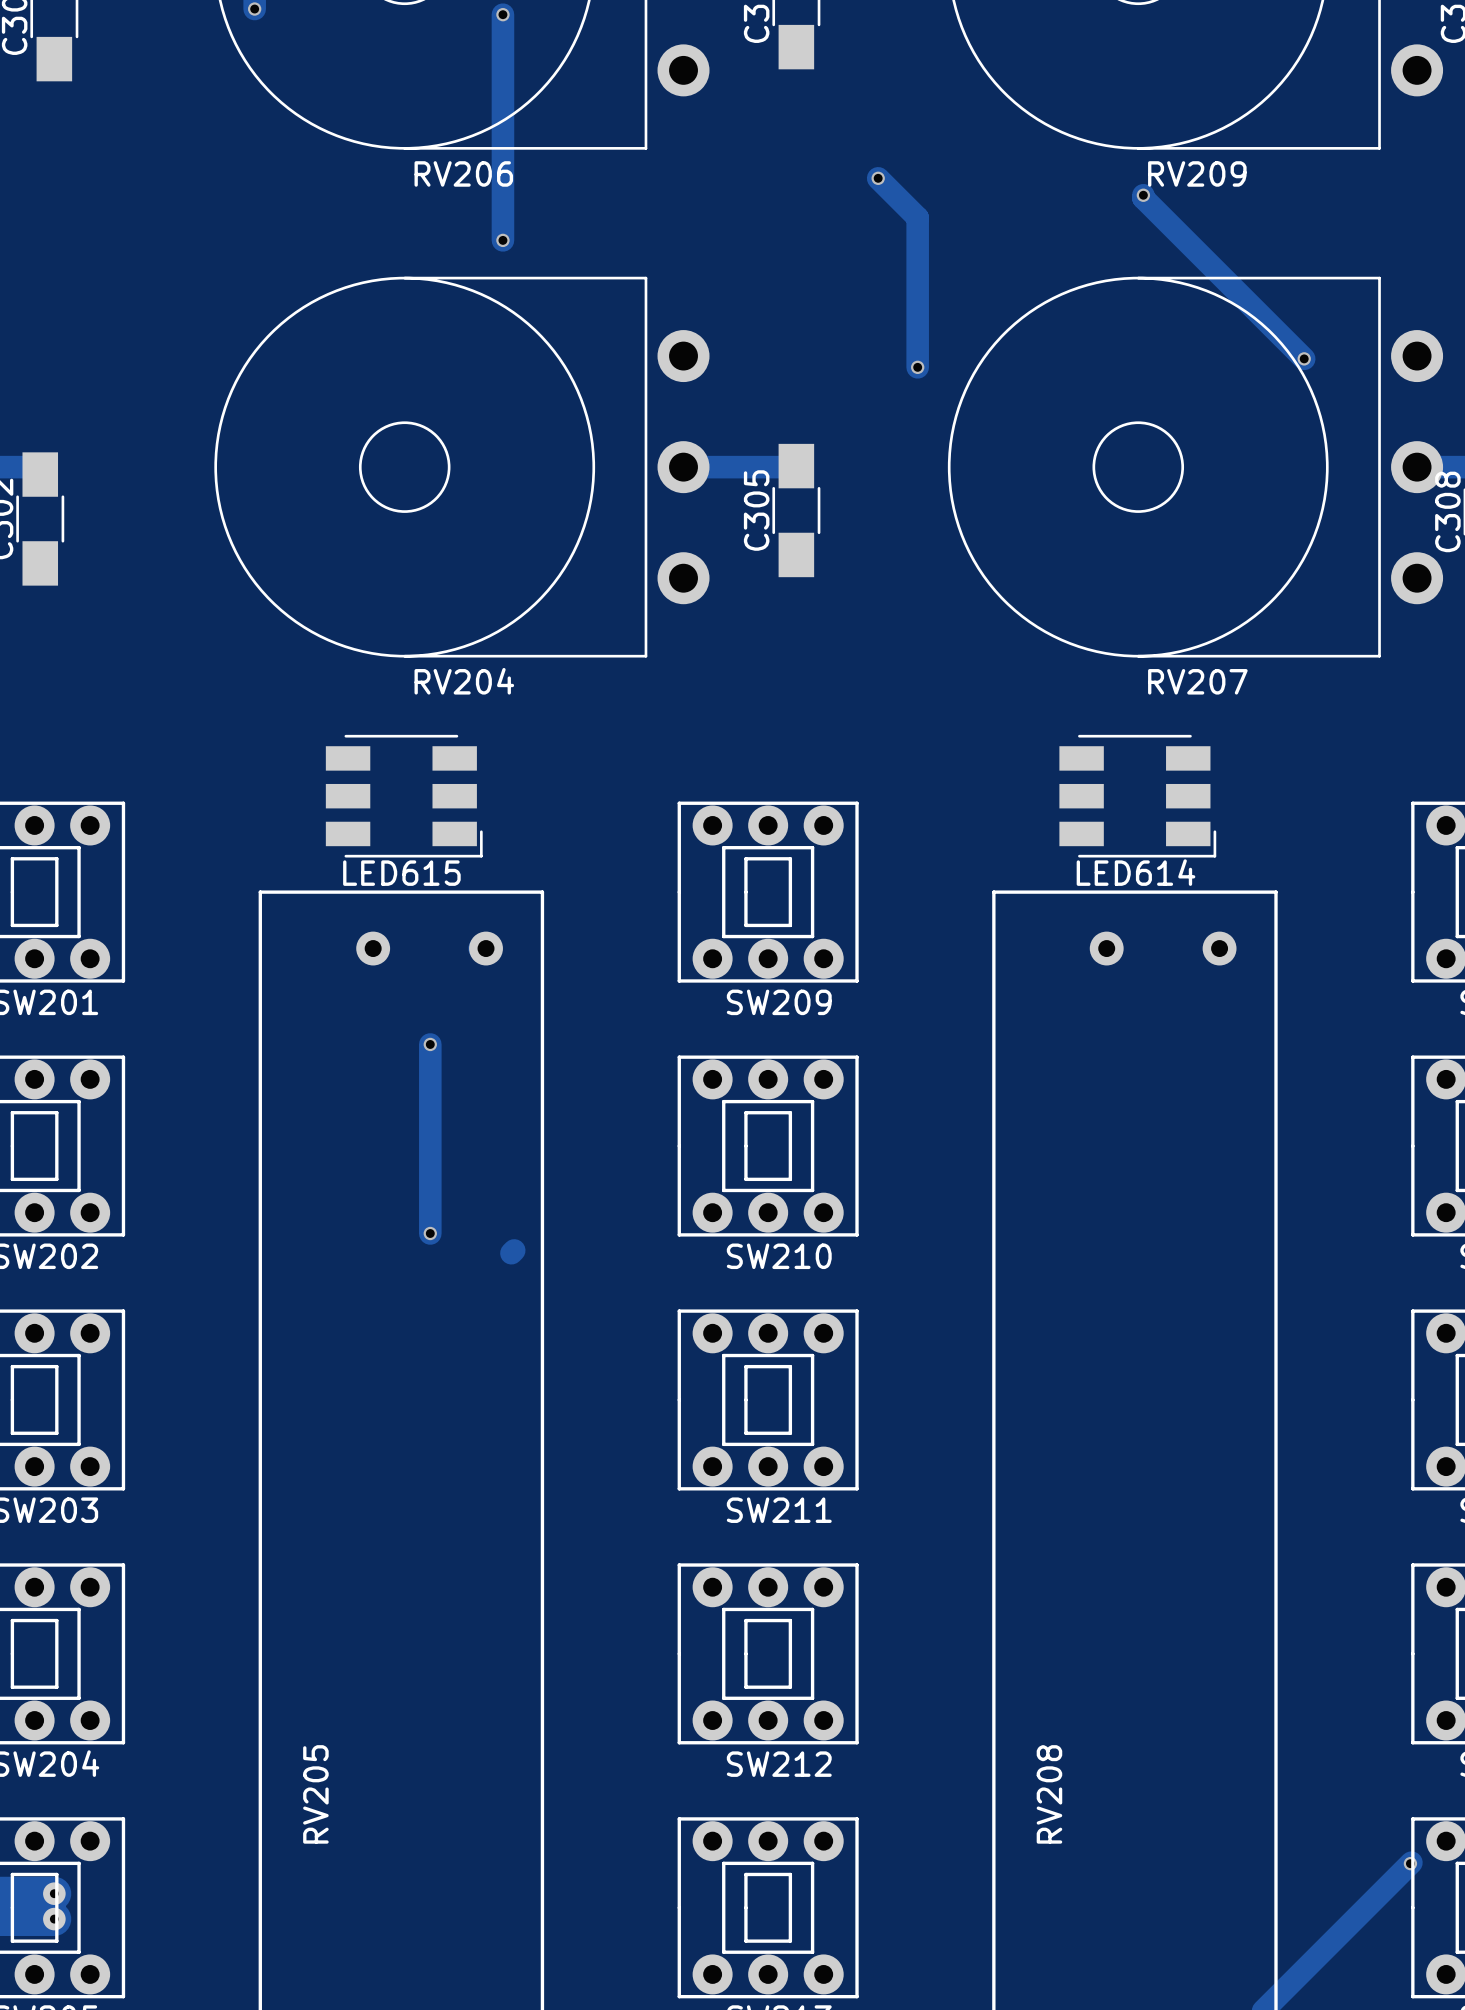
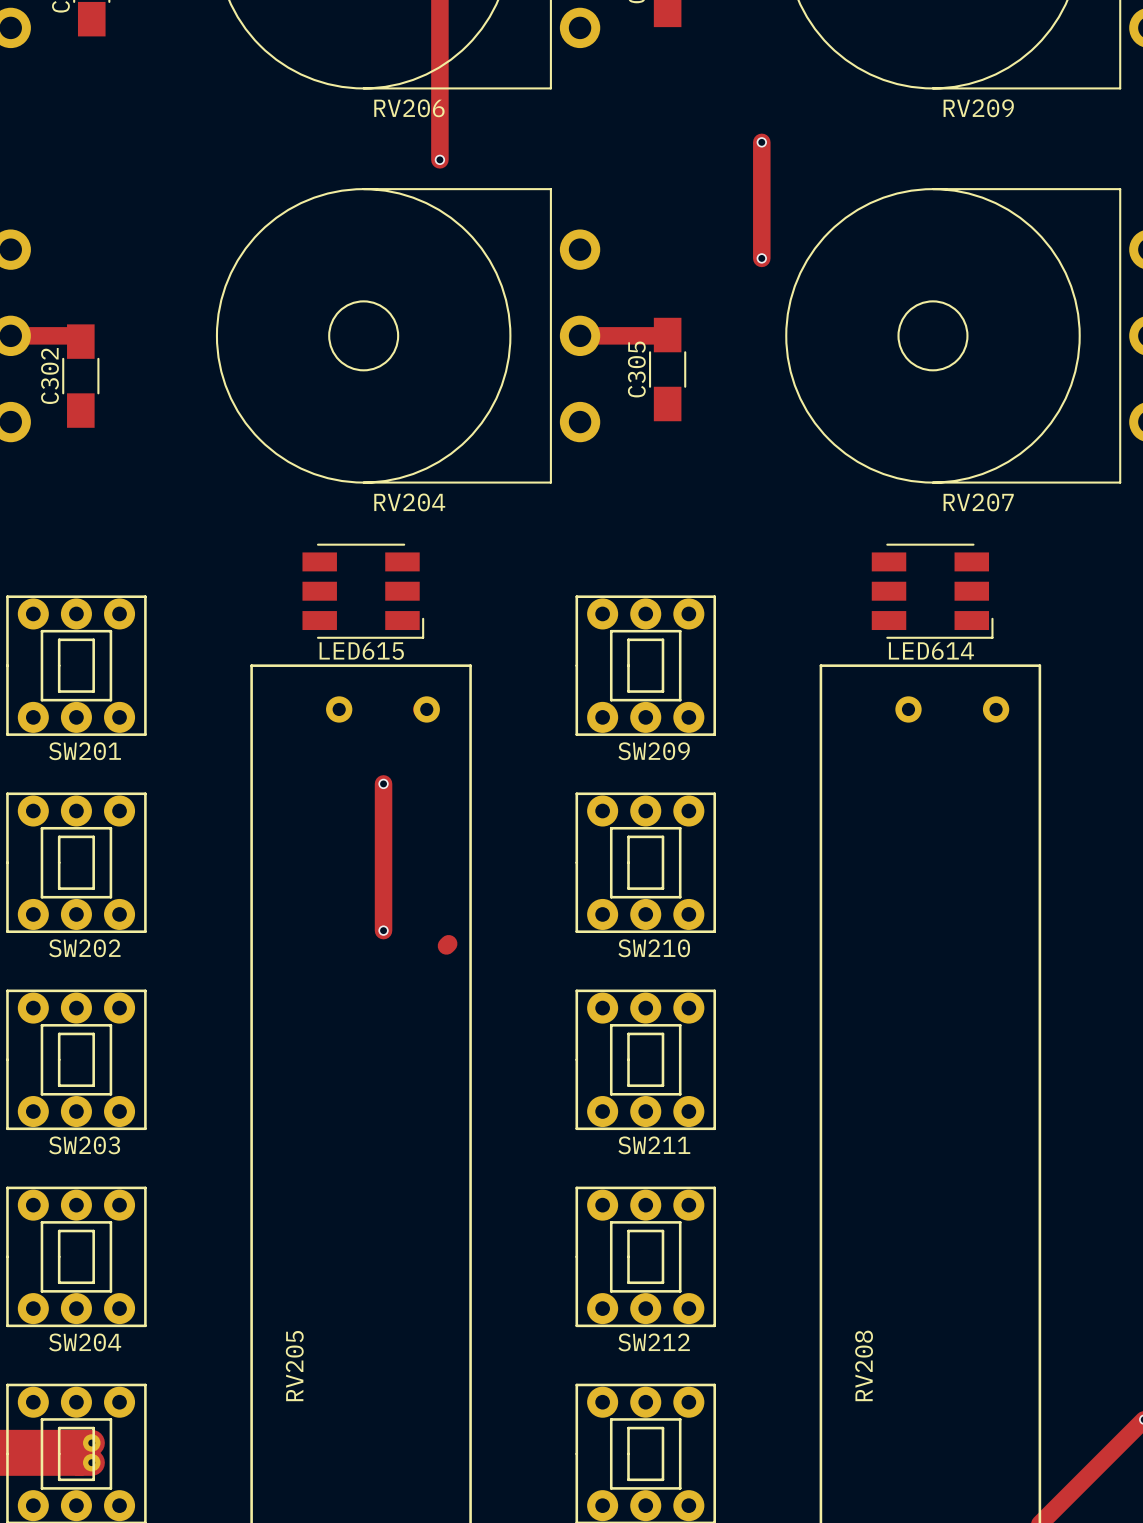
track: (878, 178) (917, 217) -> none
via position: (878, 178) -> (761, 142)
track: (1143, 195) (1143, 198) (1304, 358) -> none
via: (1143, 195) -> none
via: (1304, 358) -> none

